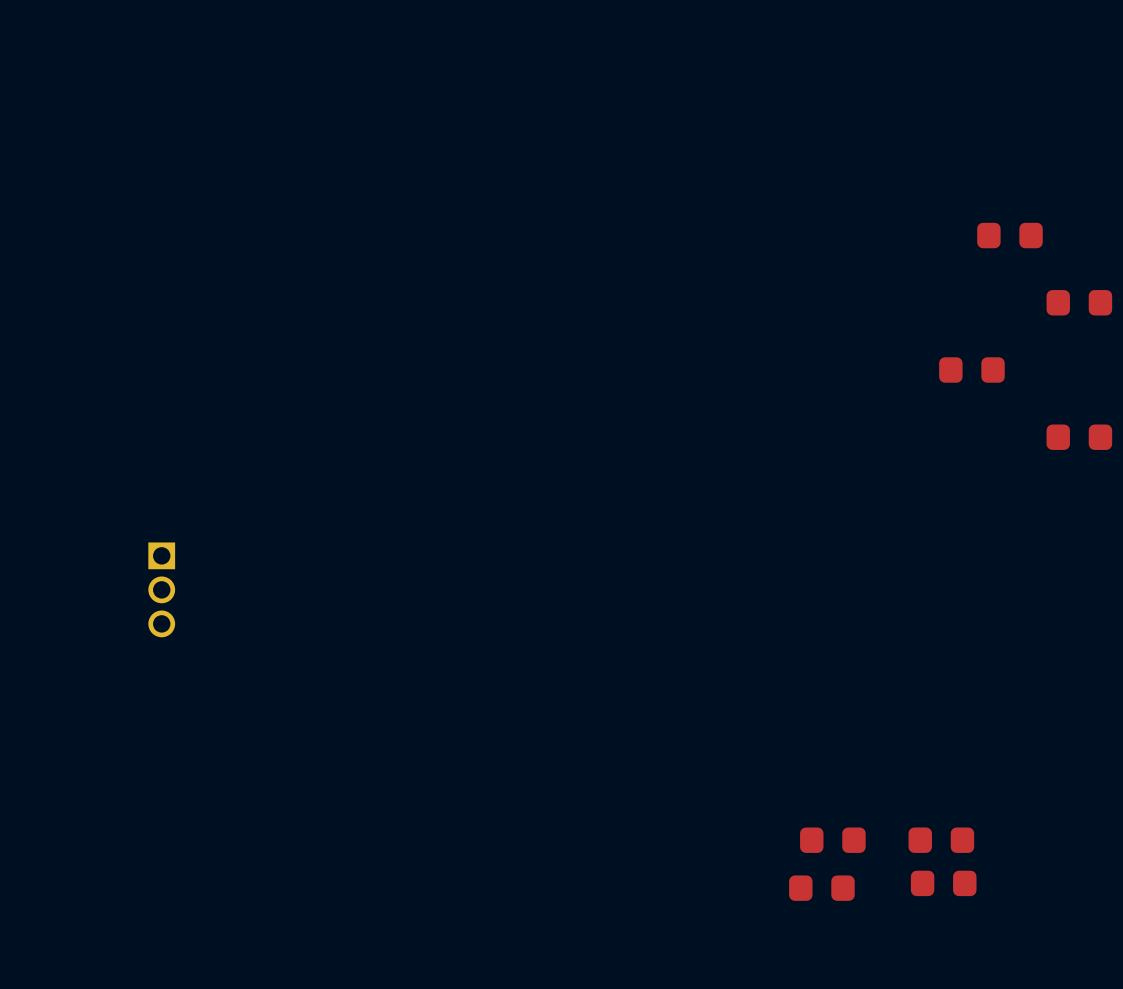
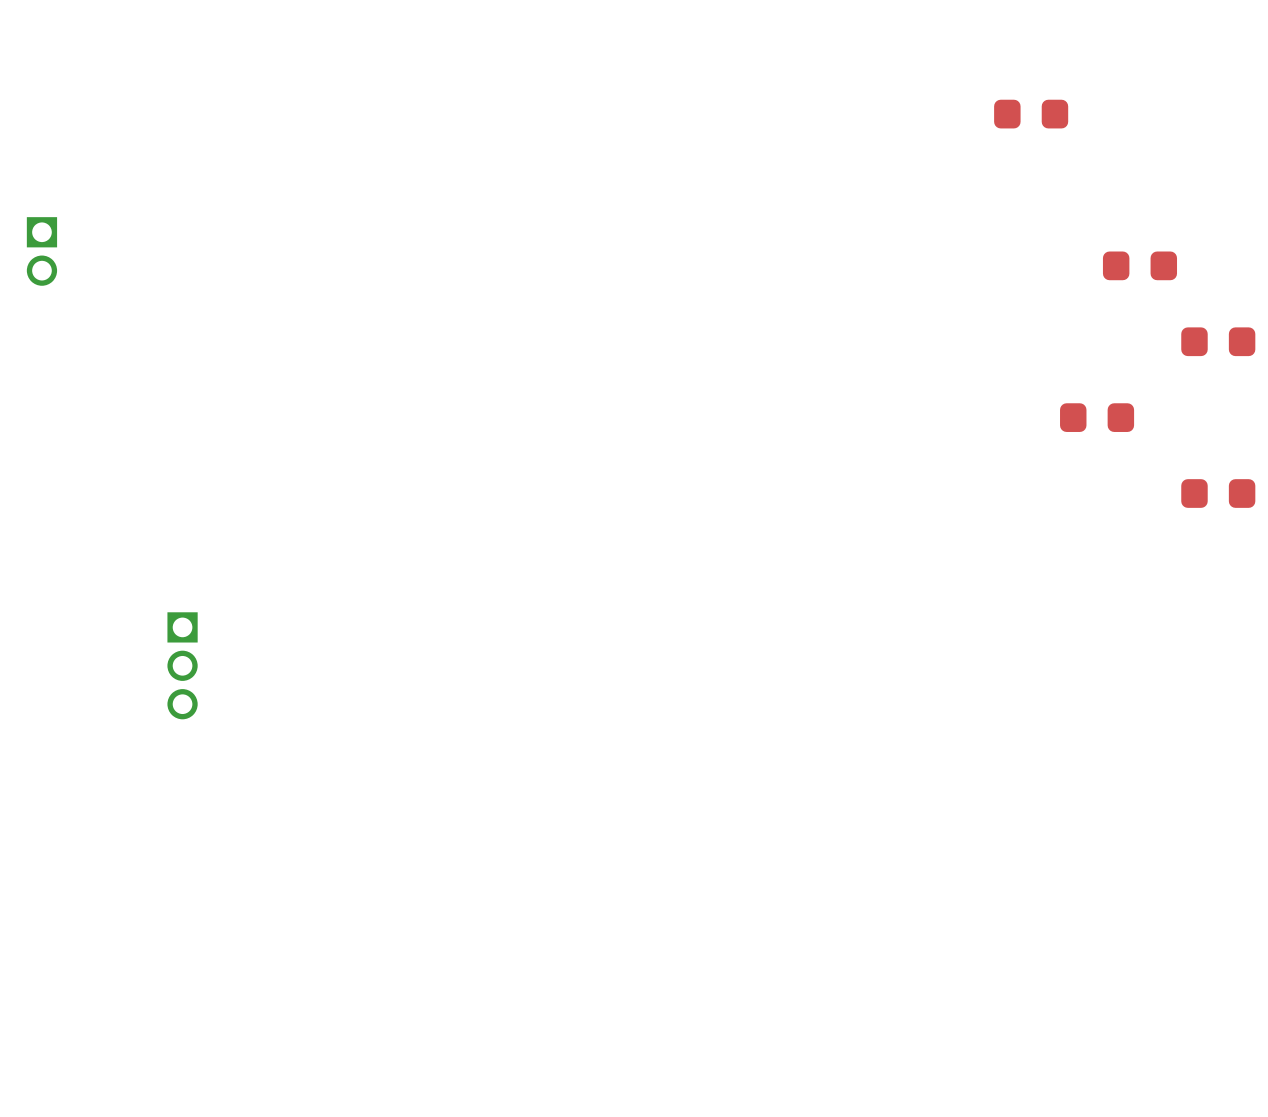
part: none -> (1031, 114)
part: none -> (41, 251)
part: (832, 840) -> none
part: (941, 840) -> none
part: (943, 883) -> none
part: (821, 888) -> none

